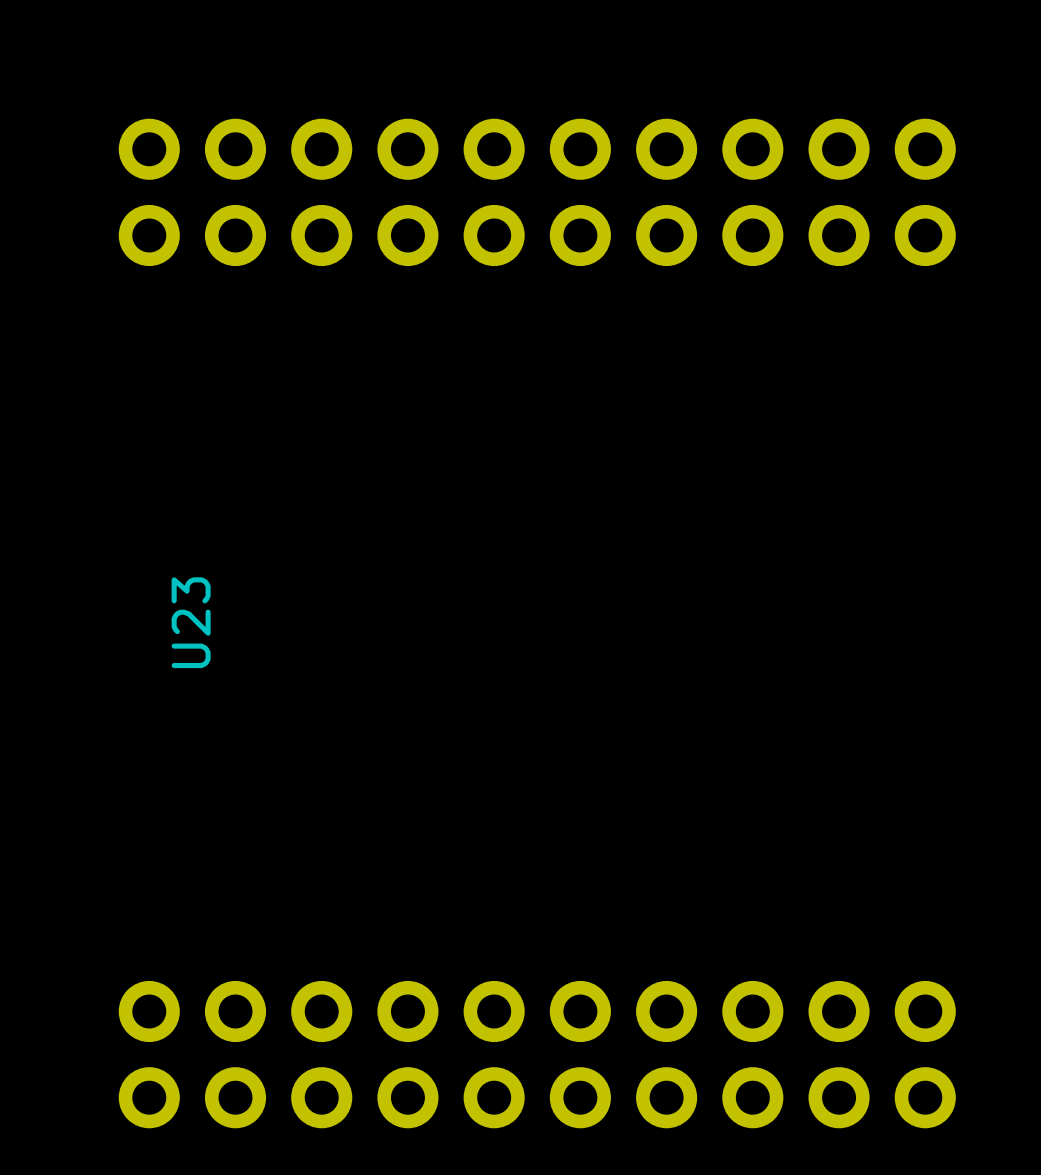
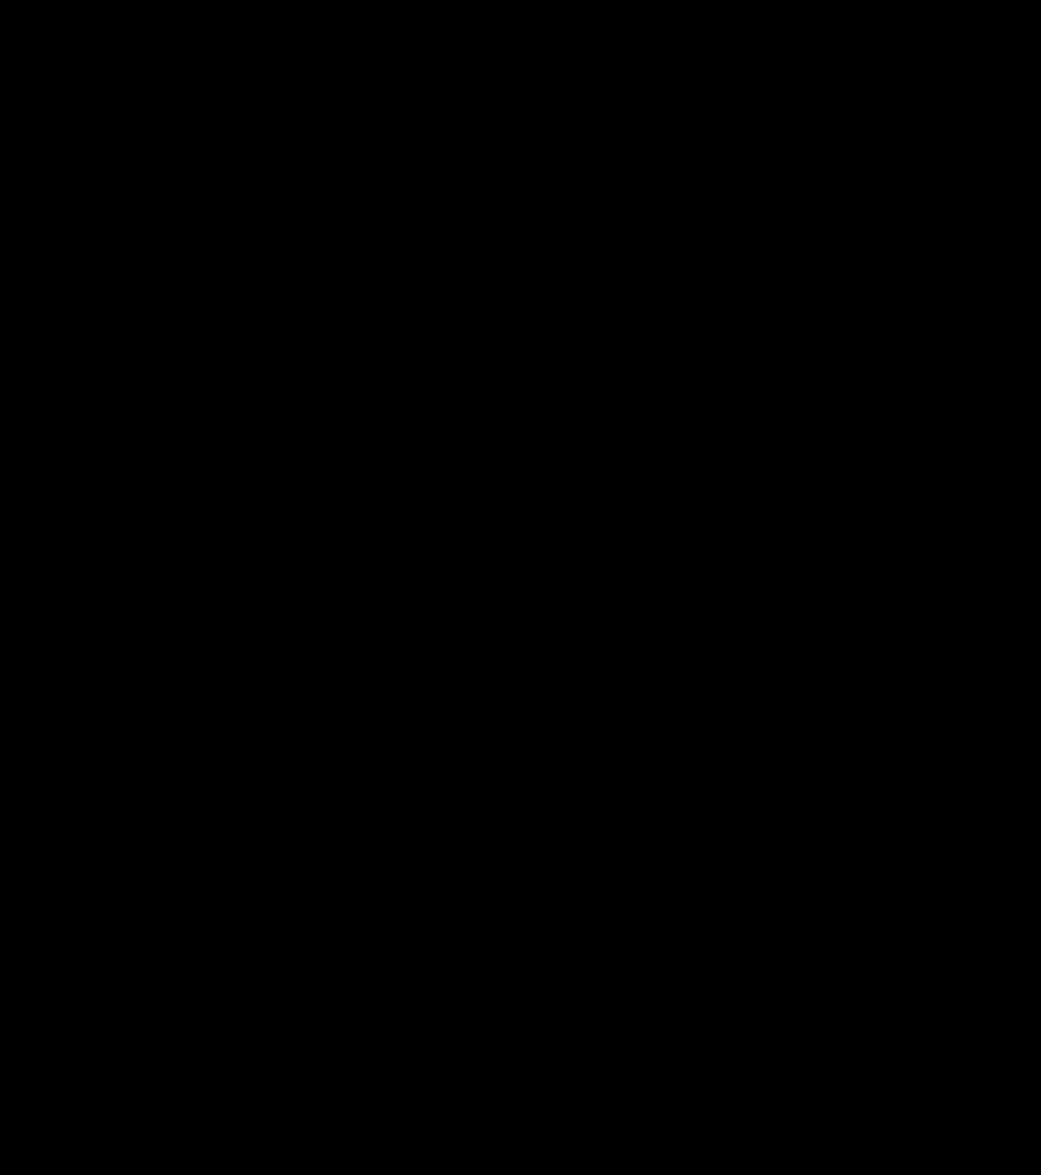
U23: (537, 623) -> none

